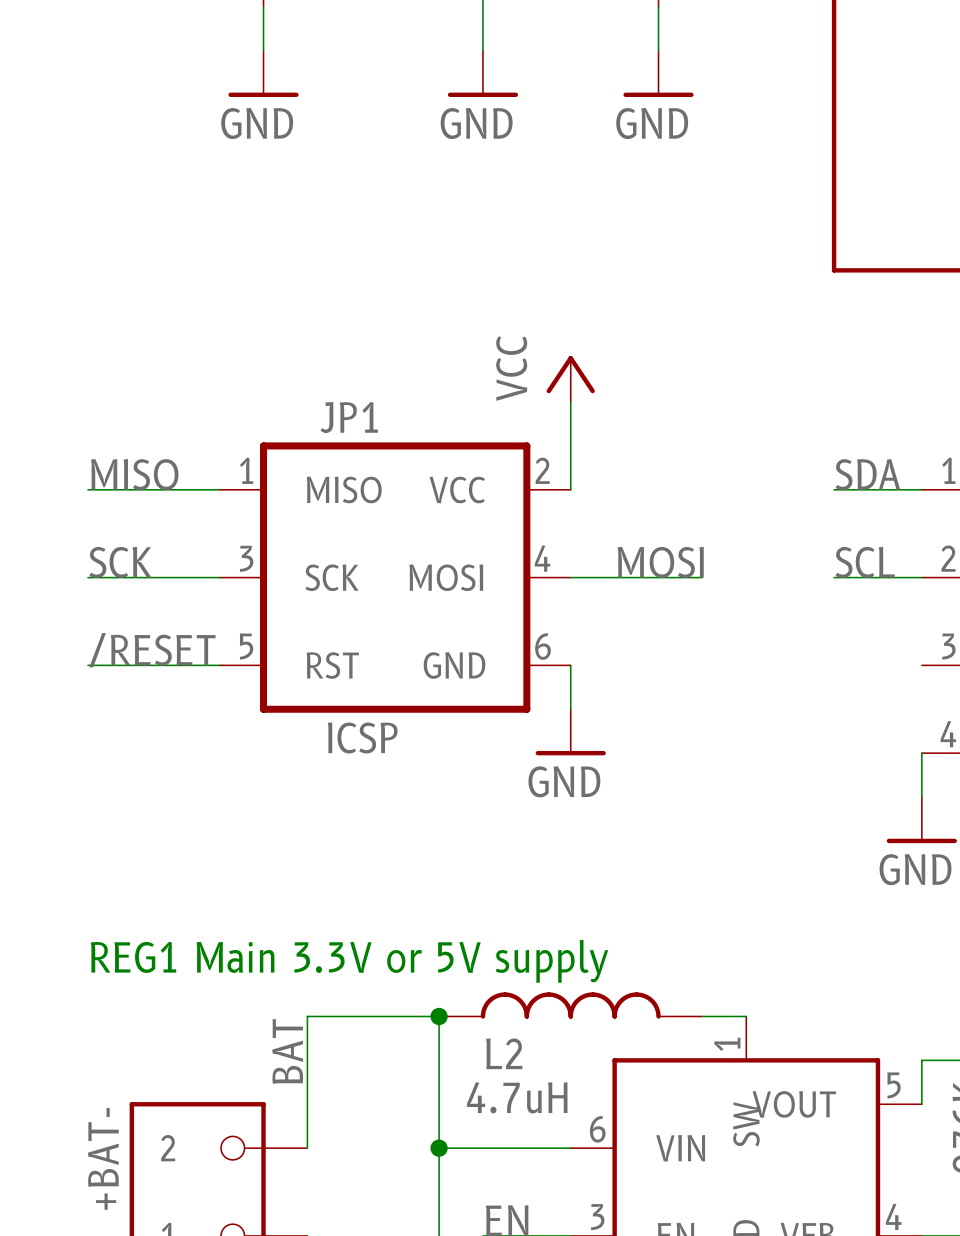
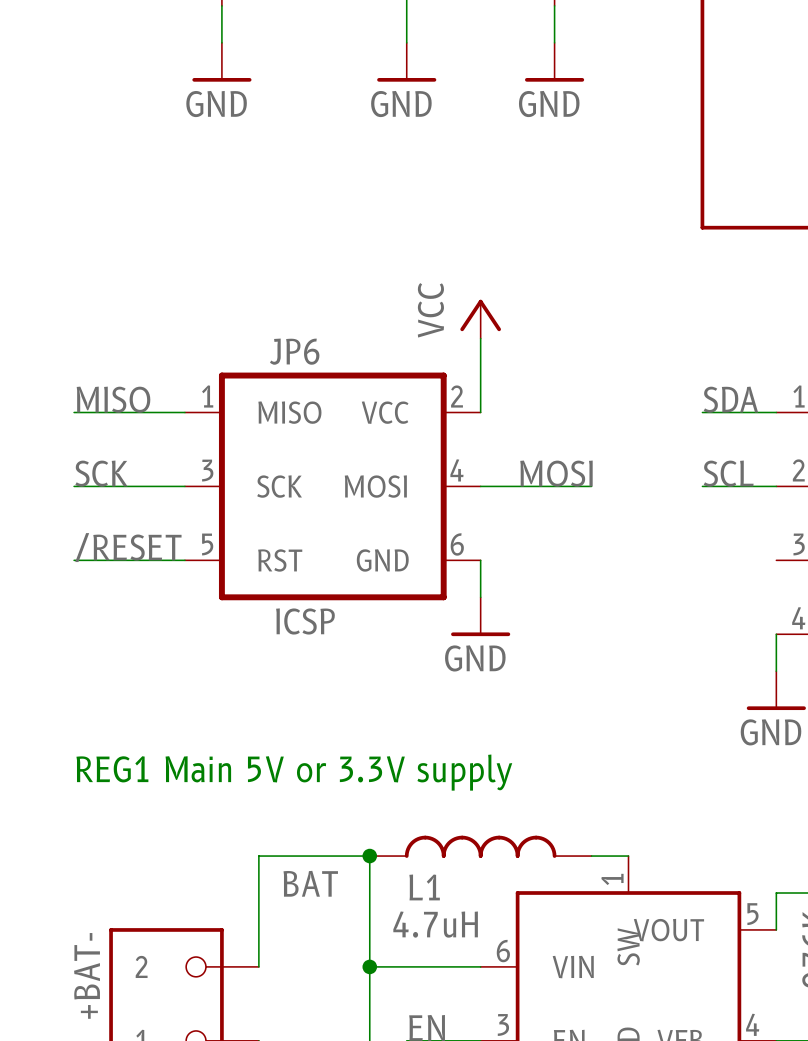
JP1 name: JP1 (349, 417) -> JP6 (294, 351)
text: REG1 Main 3.3V or 5V supply (349, 961) -> REG1 Main 5V or 3.3V supply (294, 772)
label rotation: 0° (287, 1051) -> 90° clockwise (310, 883)
L2 name: L2 (504, 1053) -> L1 (424, 887)

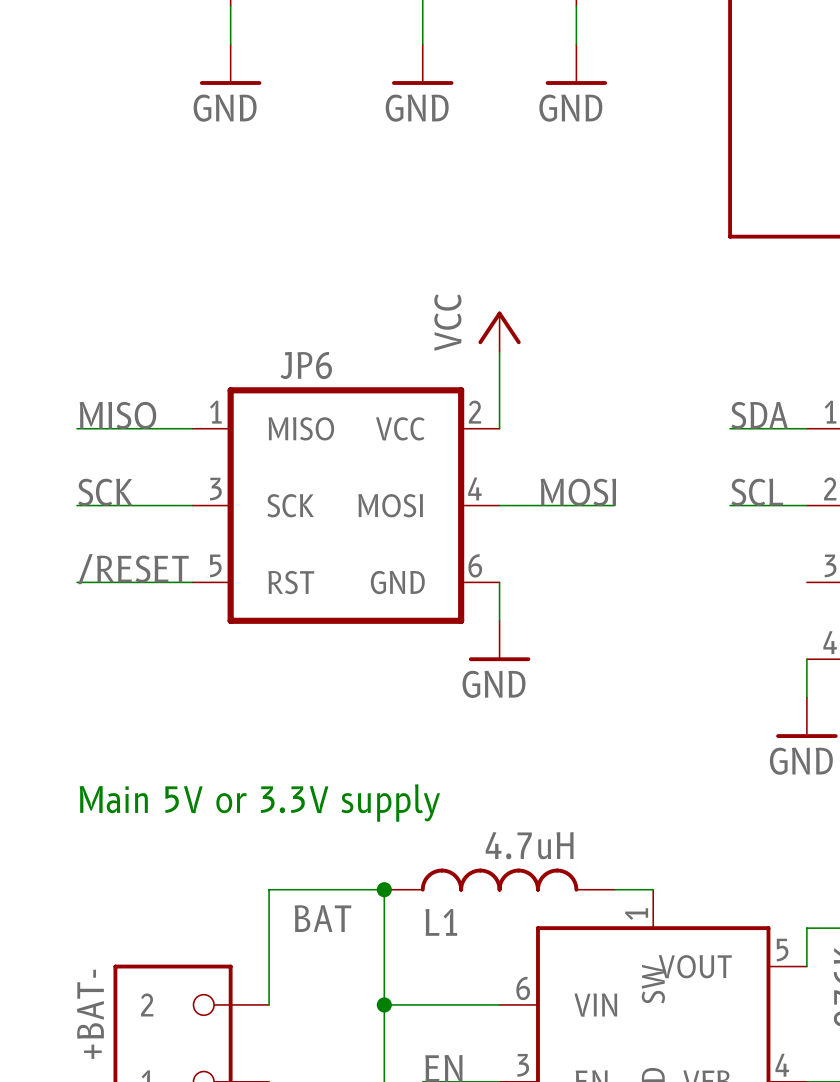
JP6 value: ICSP (305, 621) -> none
text: REG1 Main 5V or 3.3V supply (294, 772) -> Main 5V or 3.3V supply (259, 802)
L1 value position: 4.7uH (435, 924) -> 4.7uH (529, 845)

